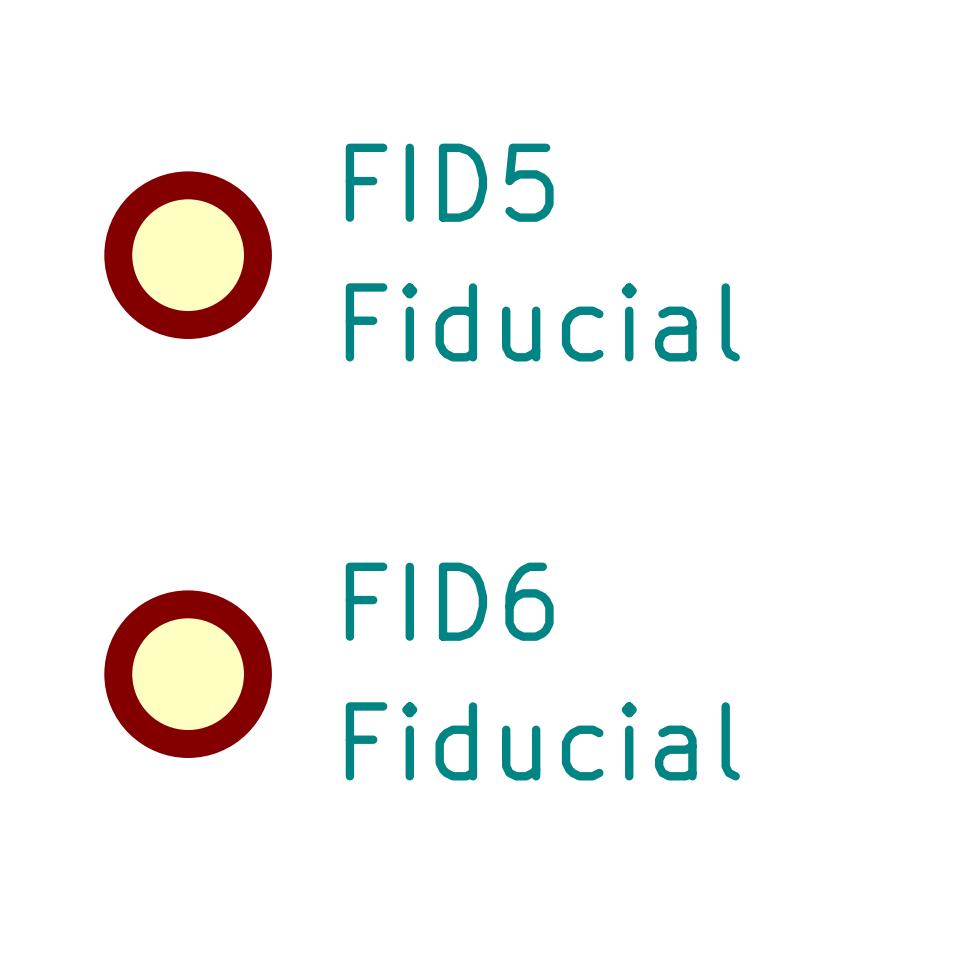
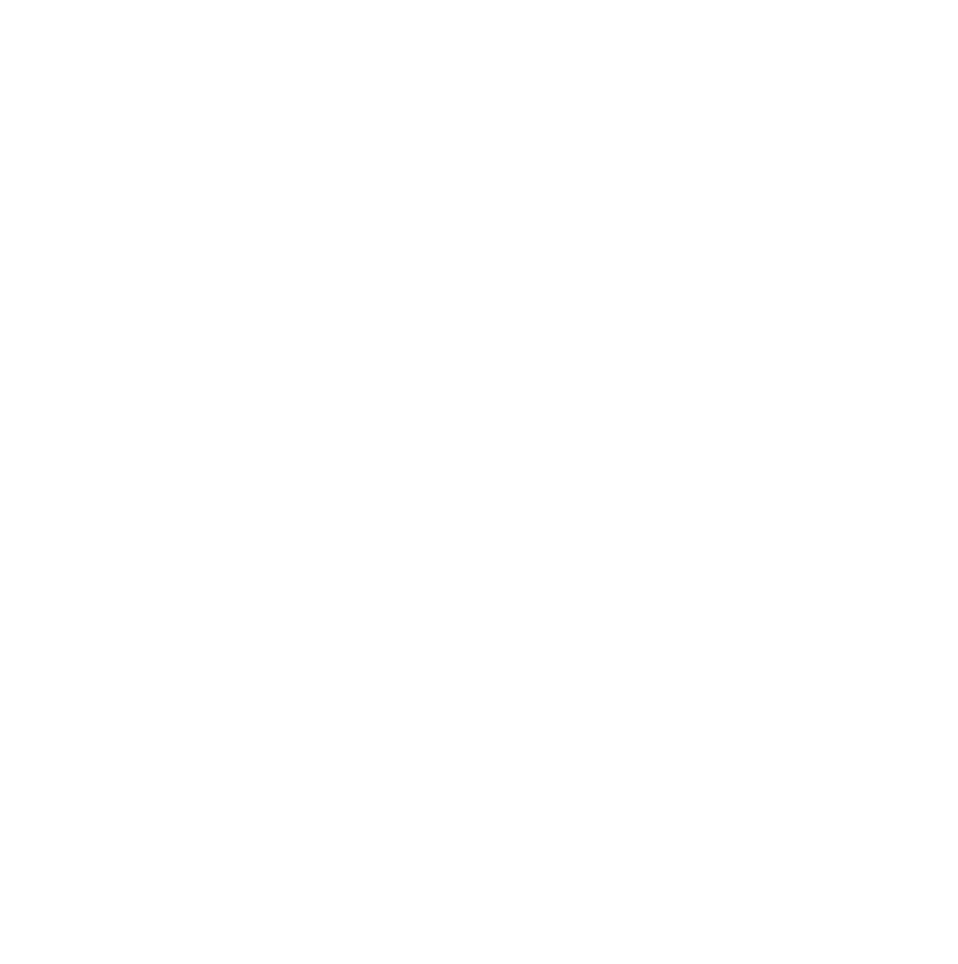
FID5: Fiducial (188, 255) -> none
FID6: Fiducial (188, 674) -> none

